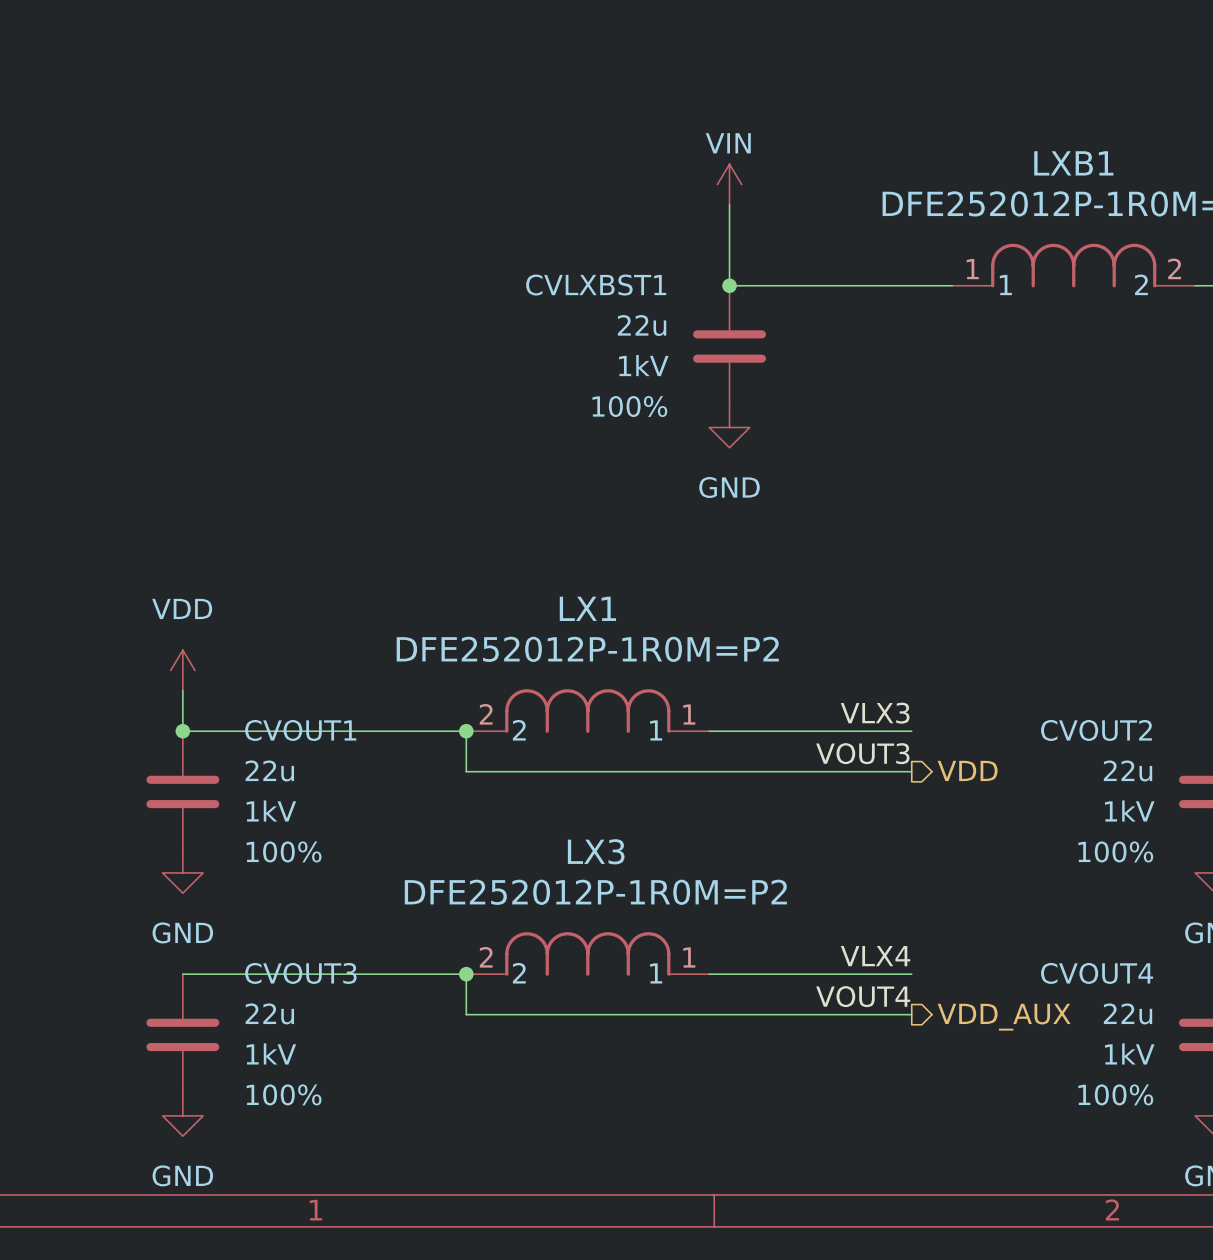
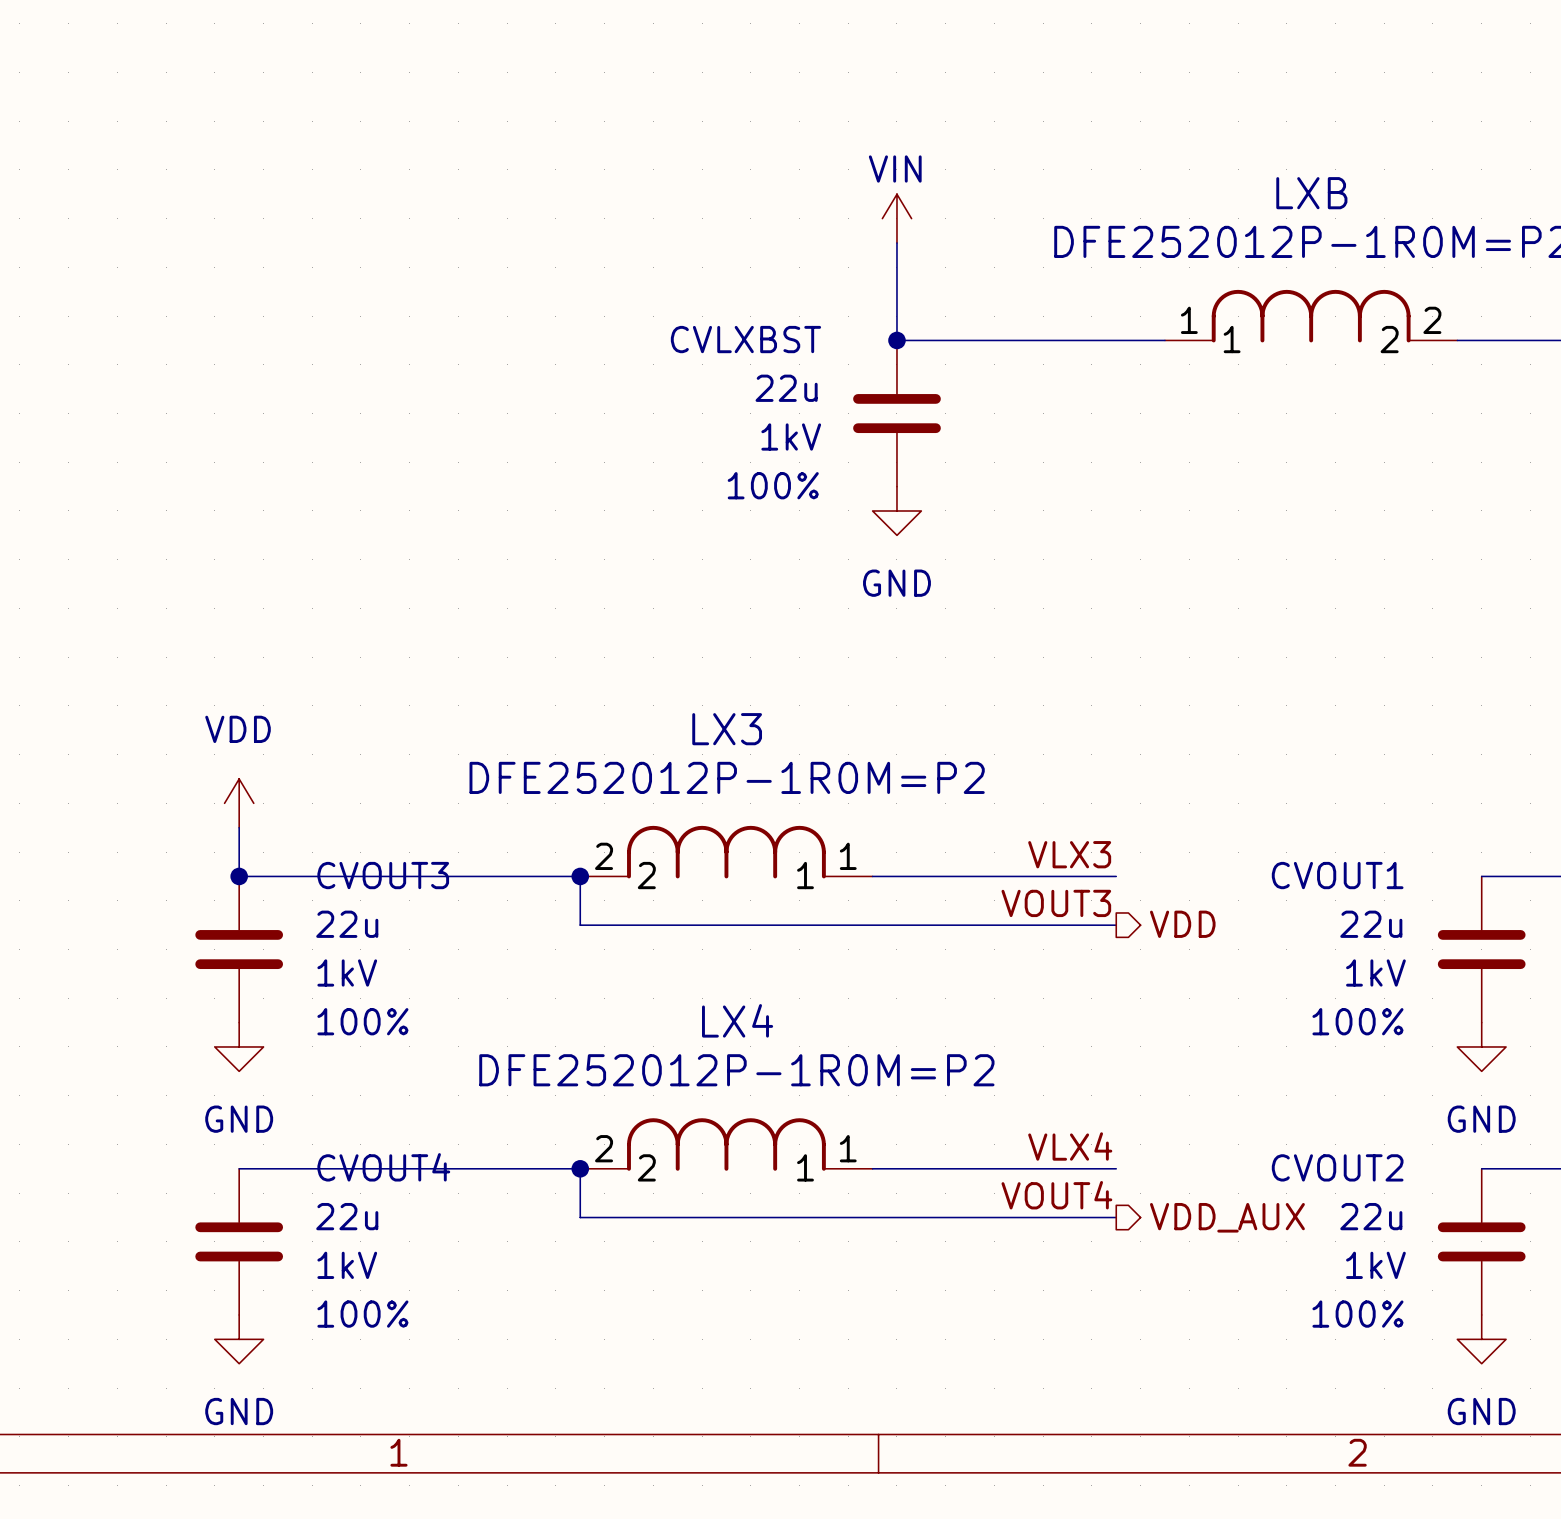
LXB1 name: LXB1 (1073, 163) -> LXB (1311, 193)
CVLXBST1 name: CVLXBST1 (596, 285) -> CVLXBST (745, 339)
LX1 name: LX1 (587, 608) -> LX3 (727, 729)
CVOUT1 name: CVOUT1 (300, 730) -> CVOUT3 (383, 875)
CVOUT2 name: CVOUT2 (1096, 730) -> CVOUT1 (1337, 875)
LX3 name: LX3 (596, 851) -> LX4 (737, 1020)
CVOUT3 name: CVOUT3 (300, 973) -> CVOUT4 (383, 1167)
CVOUT4 name: CVOUT4 (1097, 973) -> CVOUT2 (1337, 1167)

